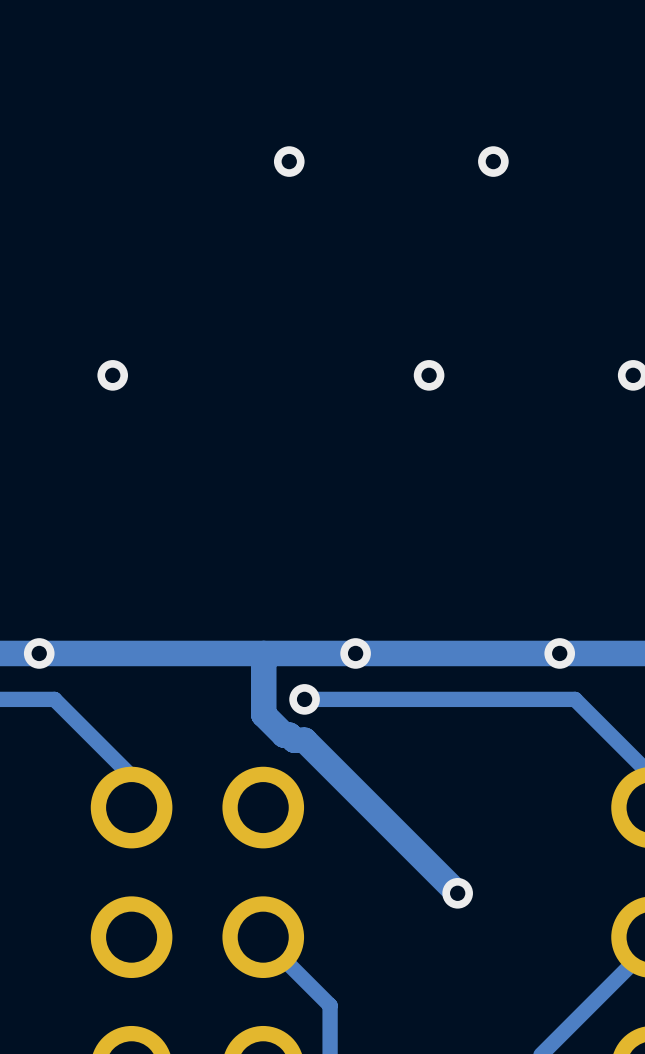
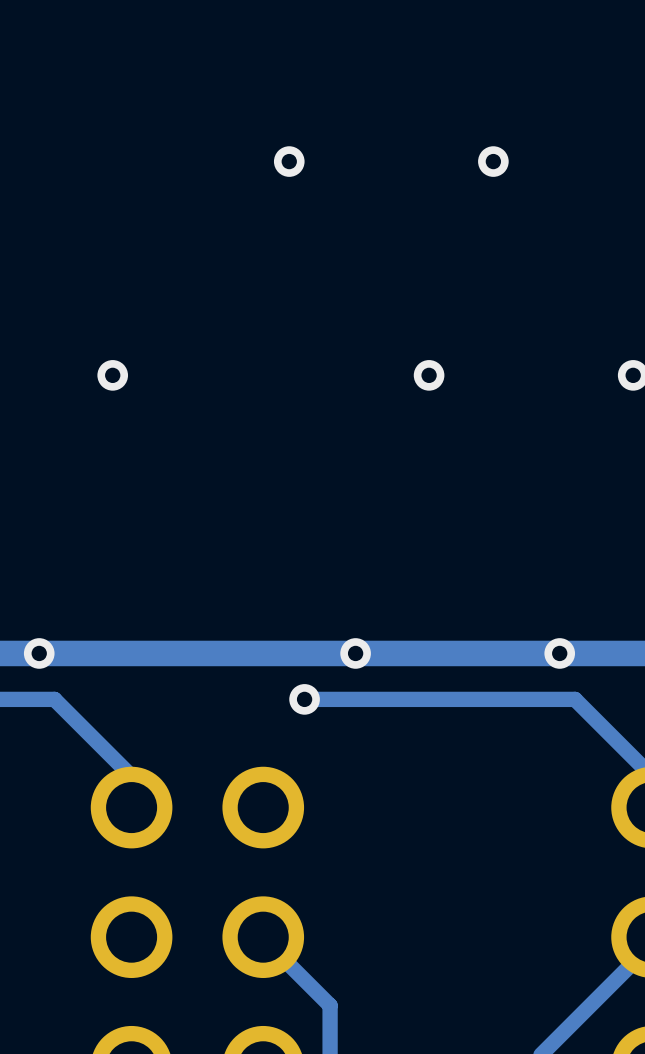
track: (263, 653) (263, 714) (284, 735) (289, 735) (294, 740) (304, 740) (457, 893) -> none
via: (457, 893) -> none

